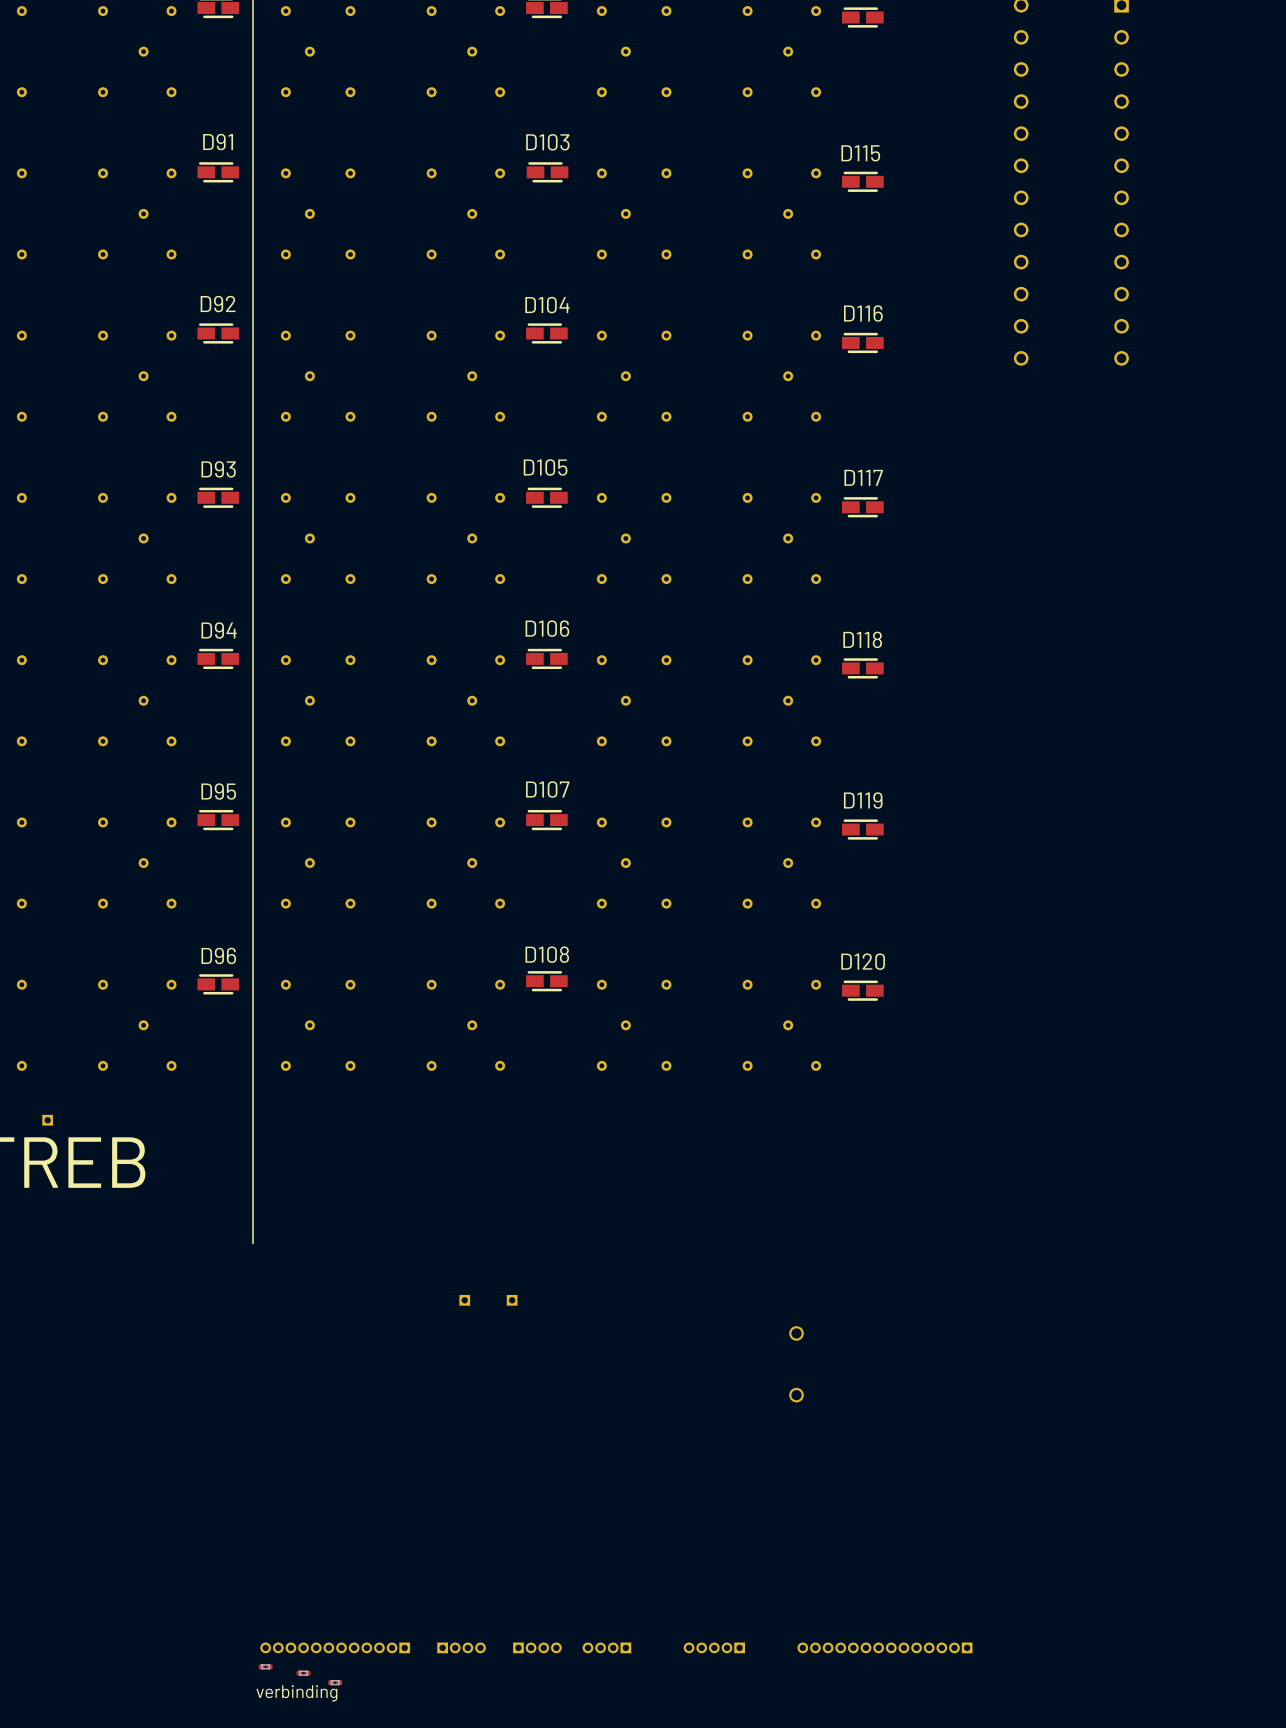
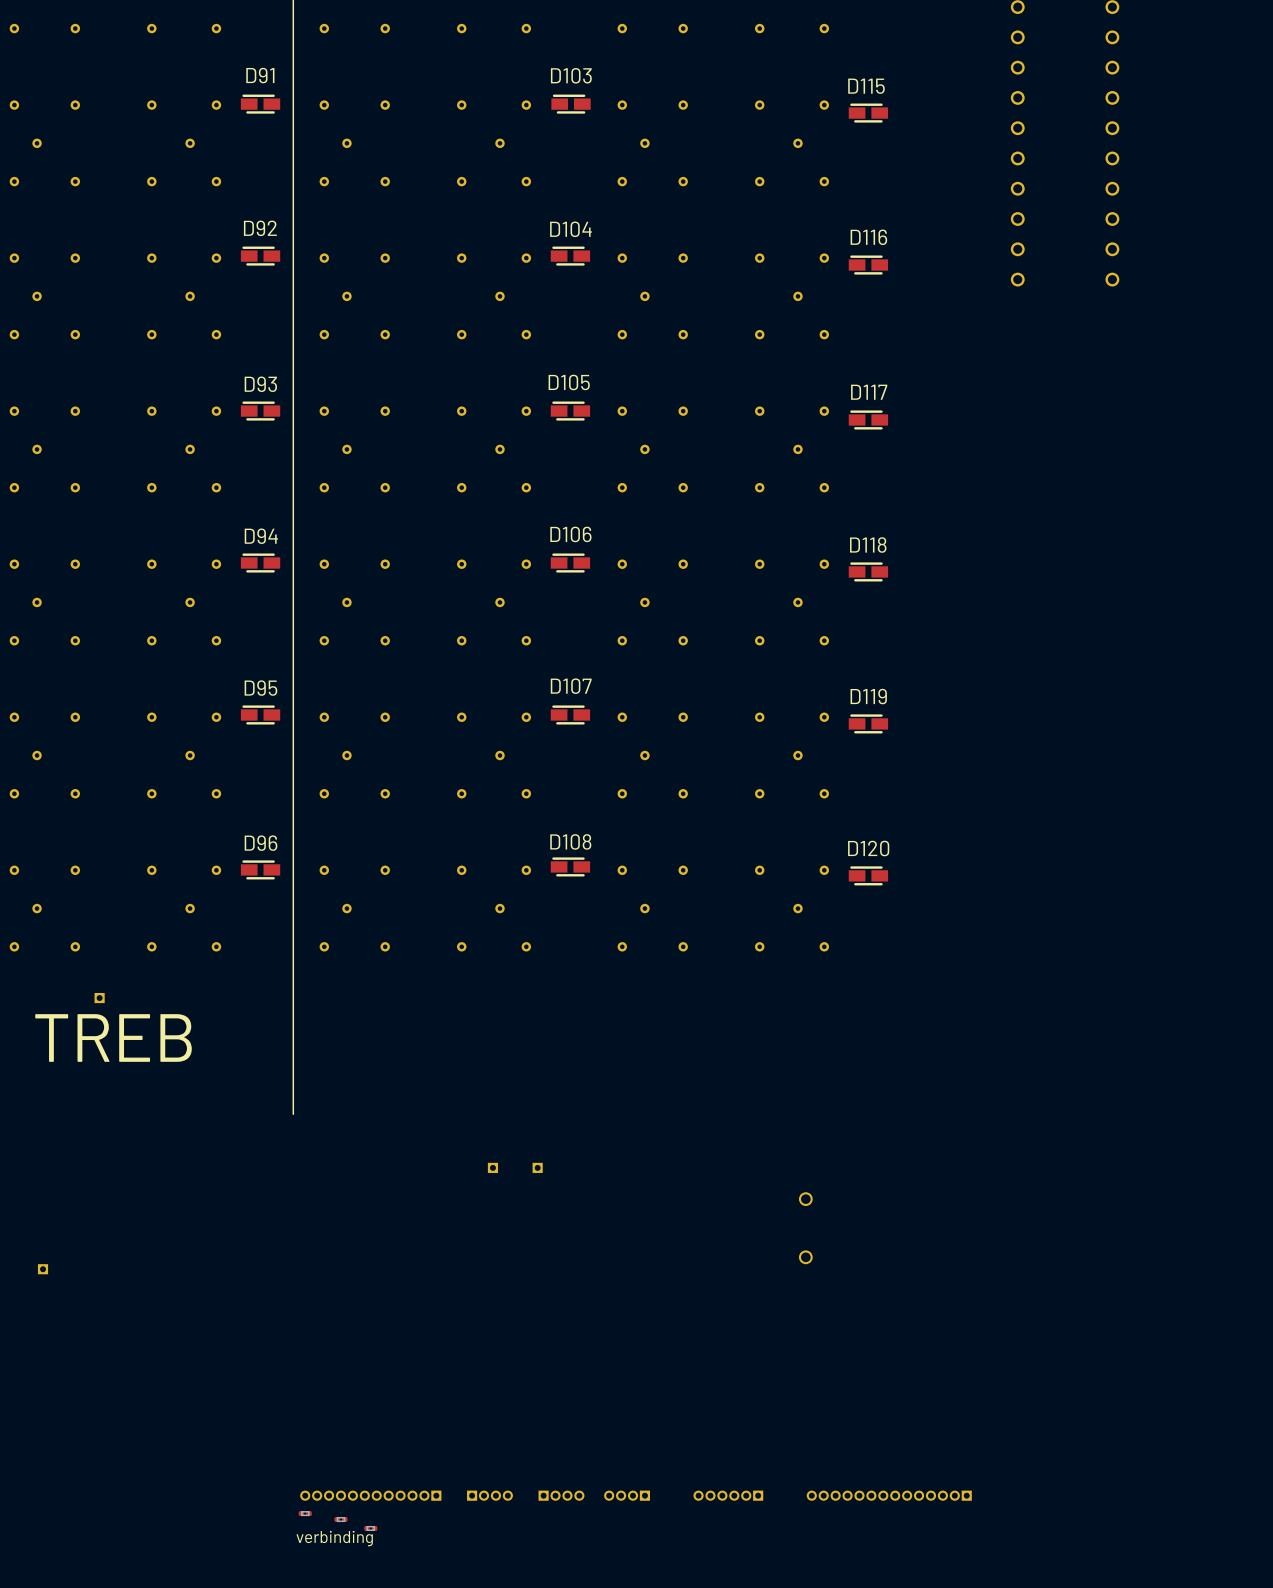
part footprint: [683, 1642, 745, 1654] -> [693, 1490, 764, 1501]

